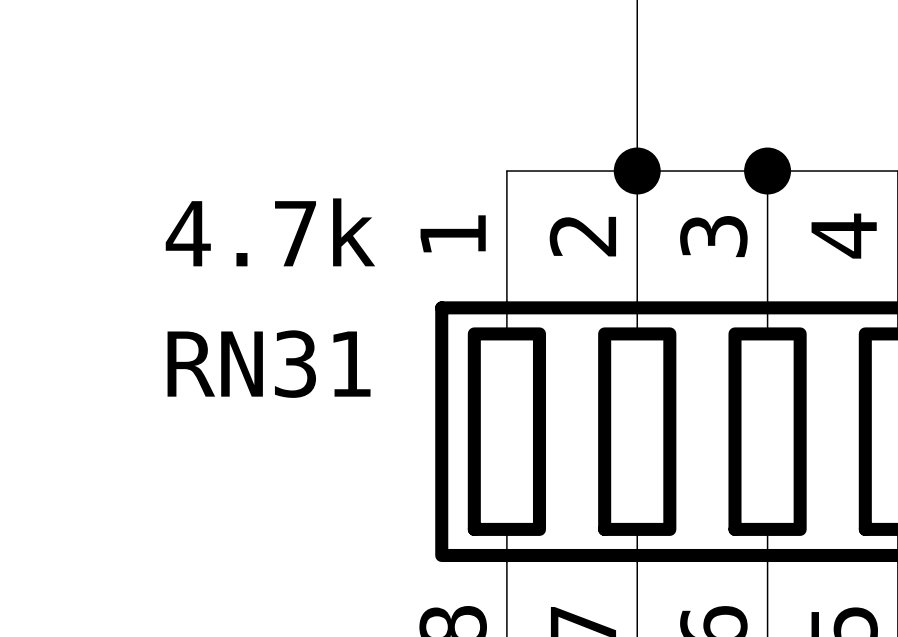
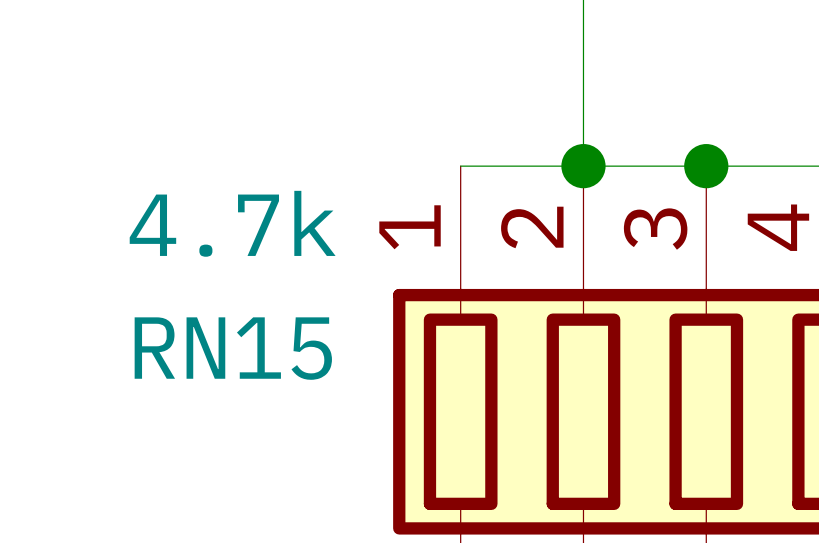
RN31 name: RN31 (269, 364) -> RN15 (233, 348)

